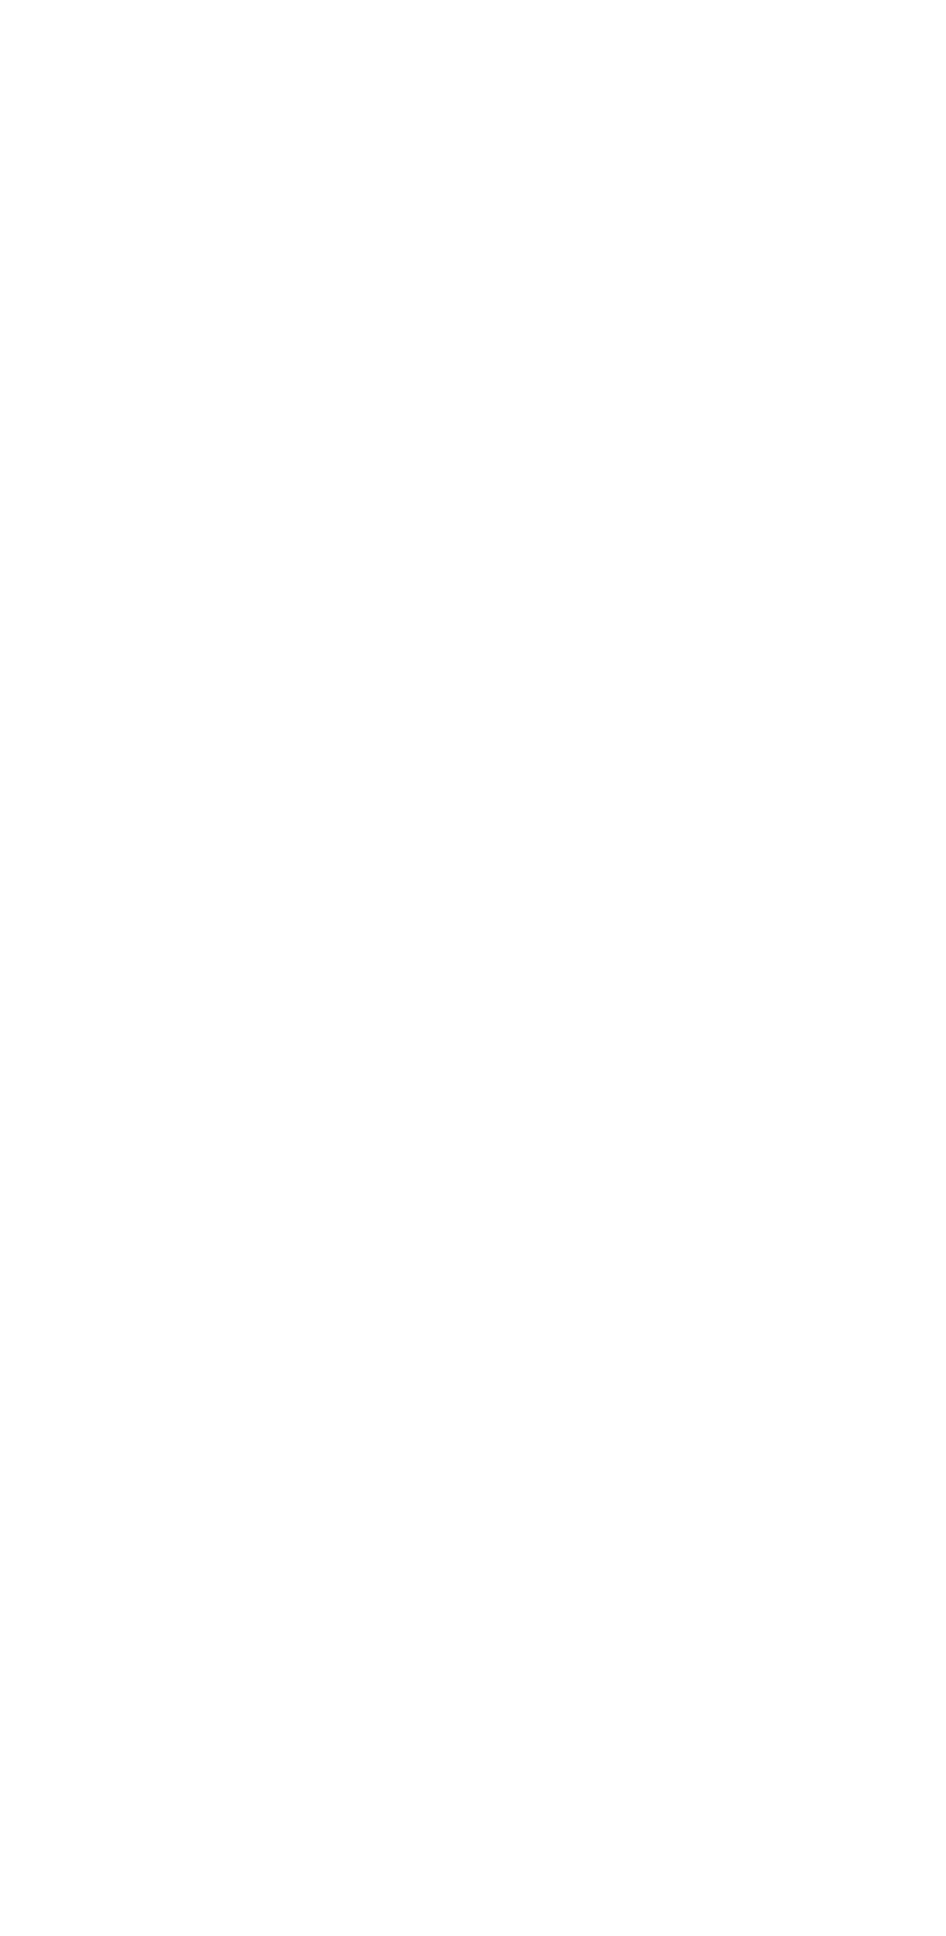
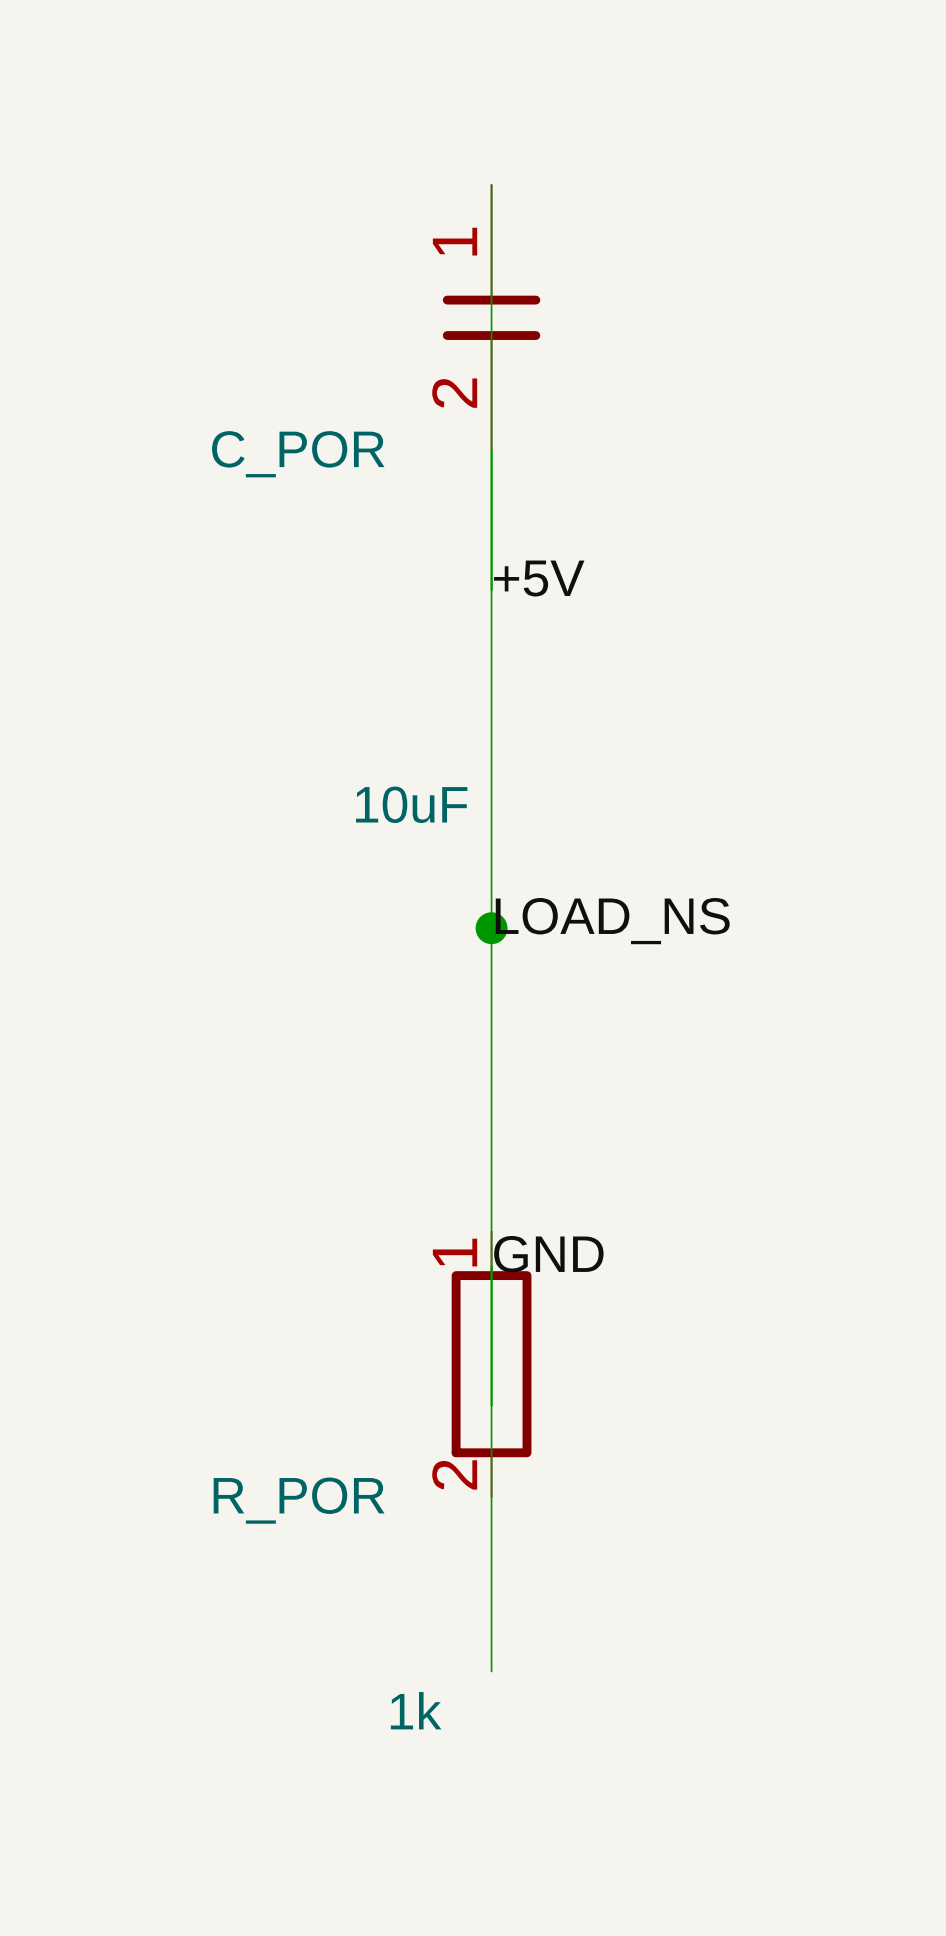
wire: none -> (491, 184) (491, 1671)
C_POR: none -> 10uF (491, 317)
label: none -> +5V (539, 578)
label: none -> LOAD_NS (612, 921)
junction: none -> (491, 928)
label: none -> GND (548, 1254)
R_POR: none -> 1k (491, 1364)

